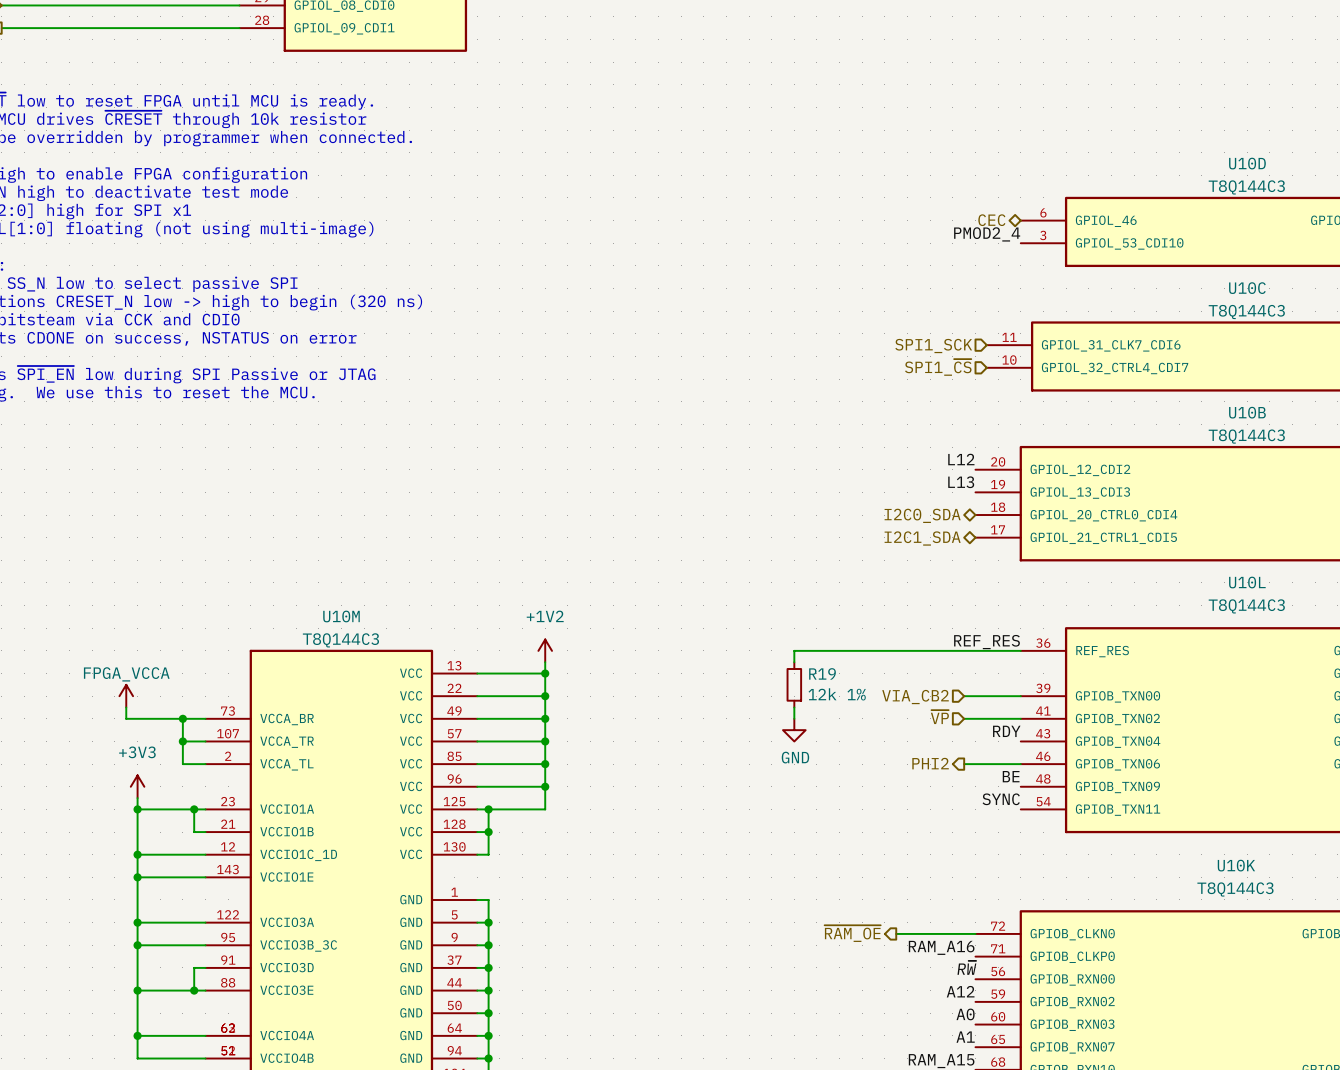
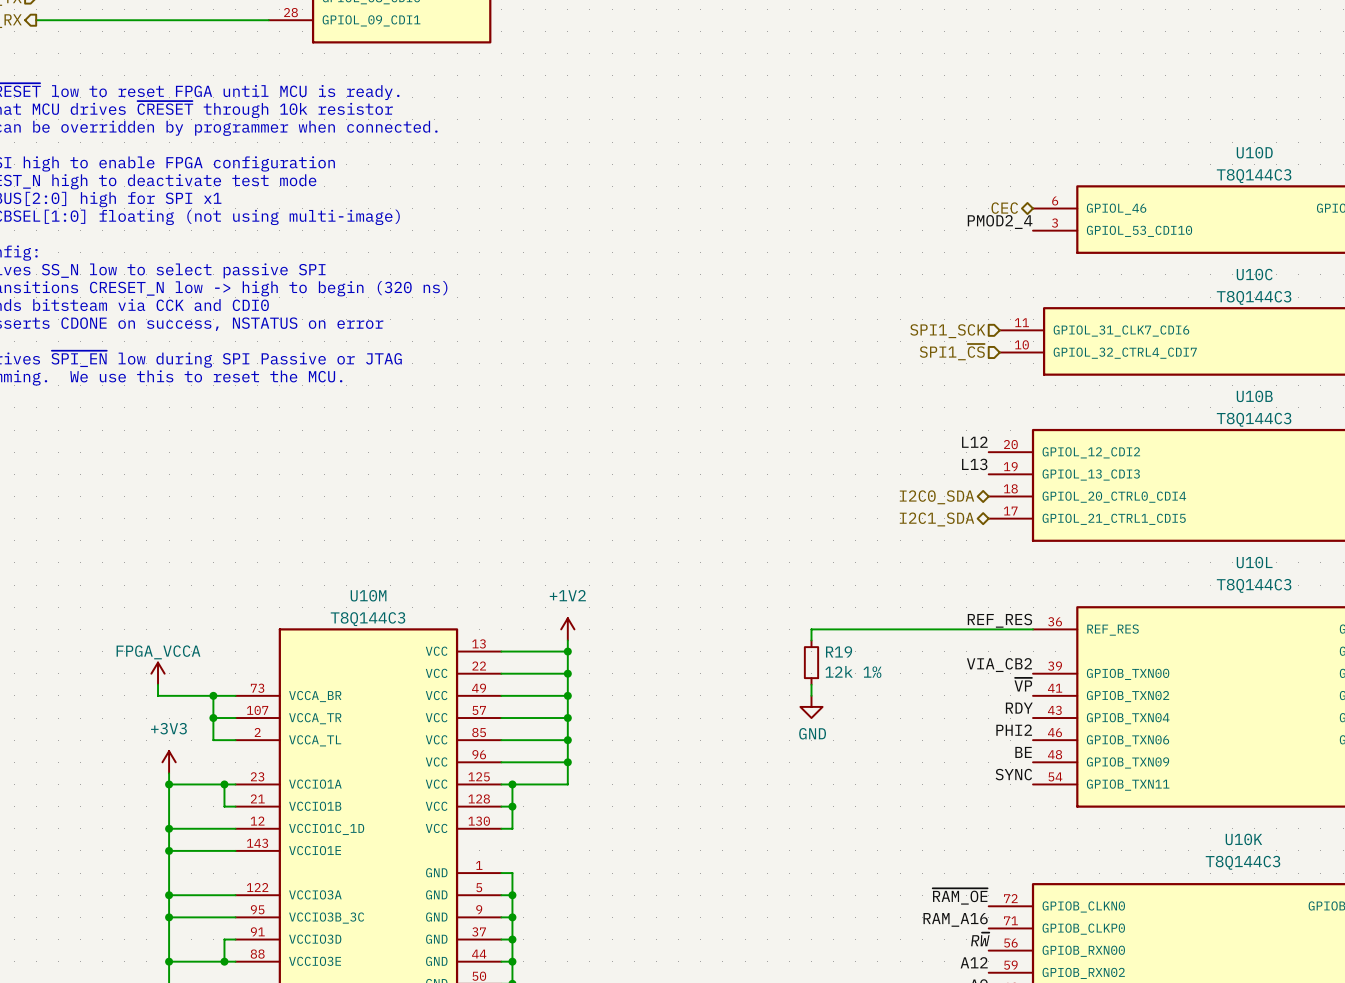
label: none -> VIA_CB2 (999, 665)
wire: (964, 696) (1020, 696) -> none
hierarchical label: VIA_CB2 (915, 697) -> none
label: none -> ~{VP} (1023, 684)
hierarchical label: ~{VP} (939, 717) -> none
wire: (964, 718) (1020, 718) -> none
label: none -> PHI2 (1014, 730)
hierarchical label: PHI2 (930, 763) -> none
wire: (964, 764) (1020, 764) -> none
label: none -> ~{RAM_OE} (960, 896)
hierarchical label: ~{RAM_OE} (852, 933) -> none
wire: (896, 933) (975, 933) -> none

